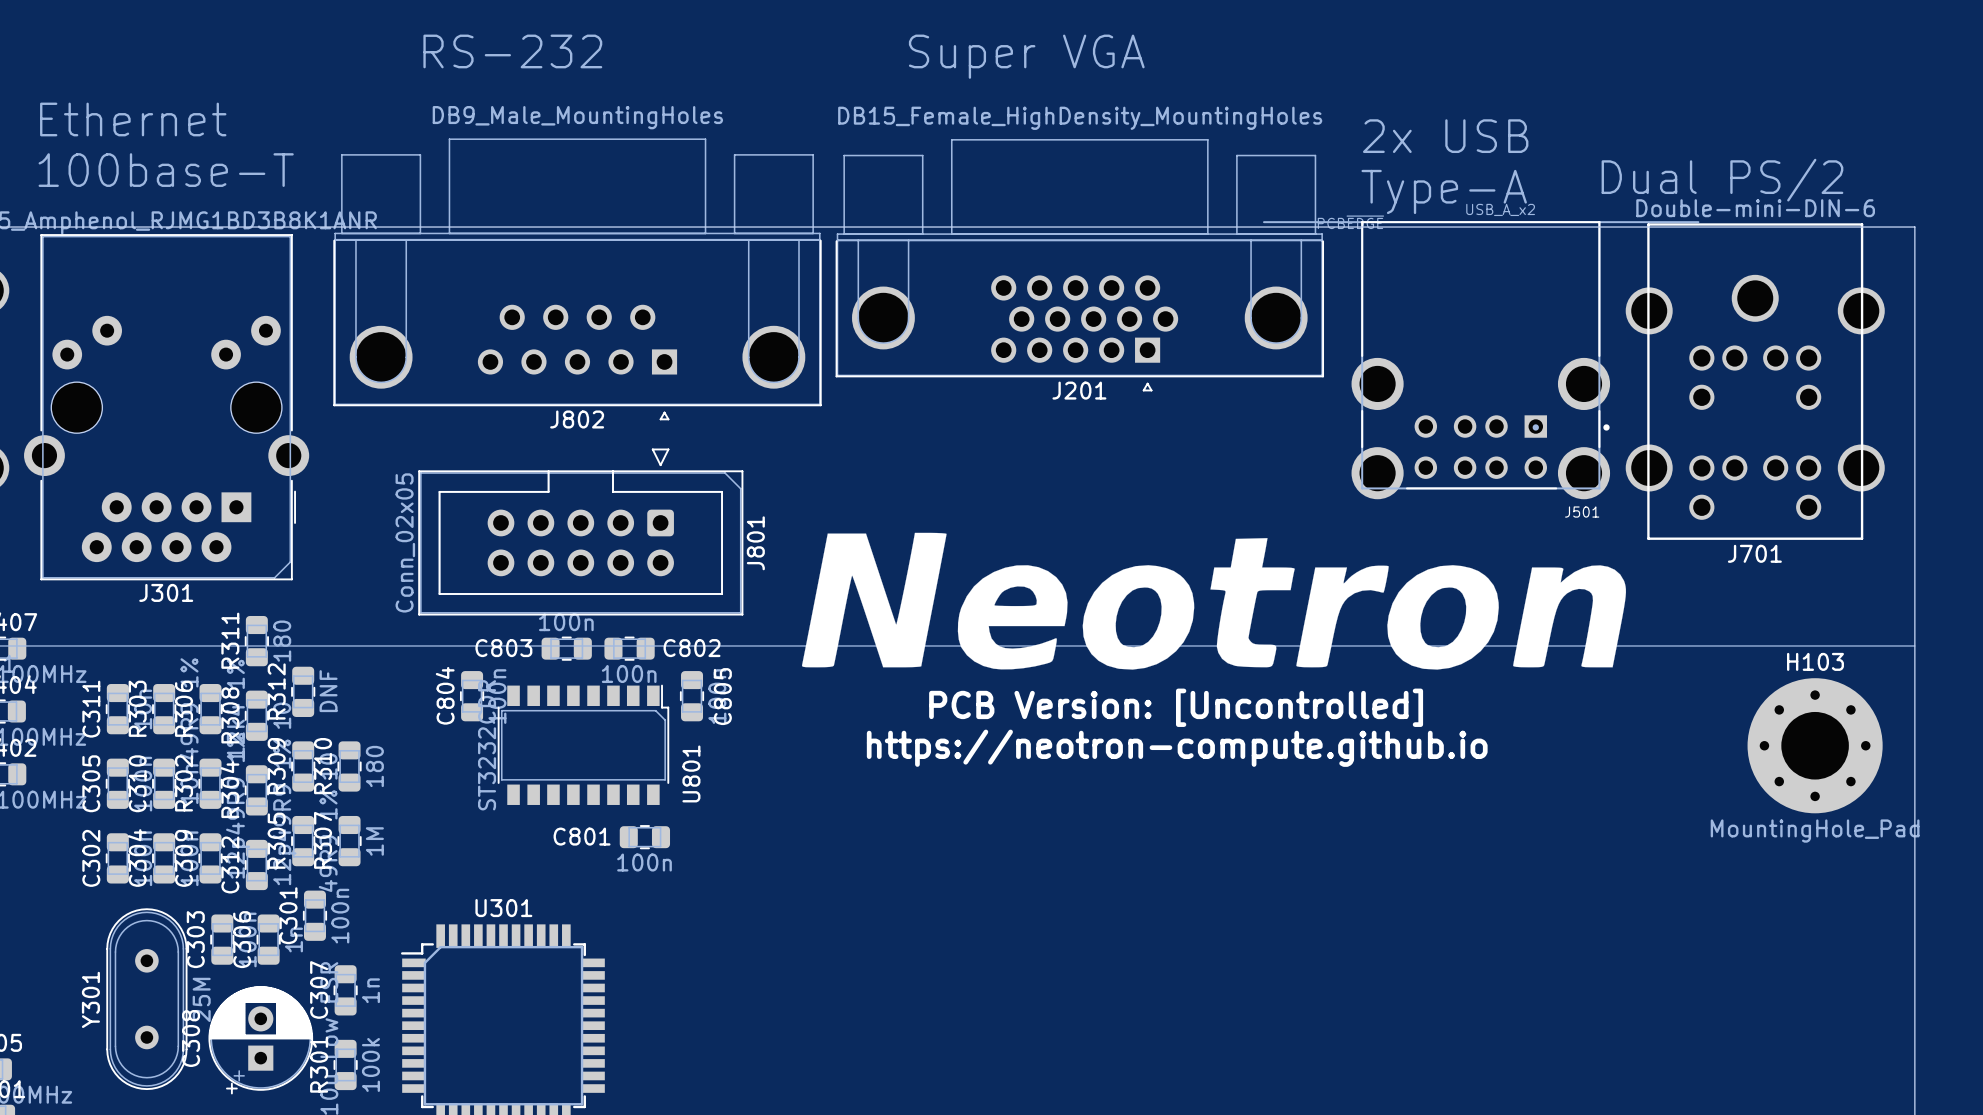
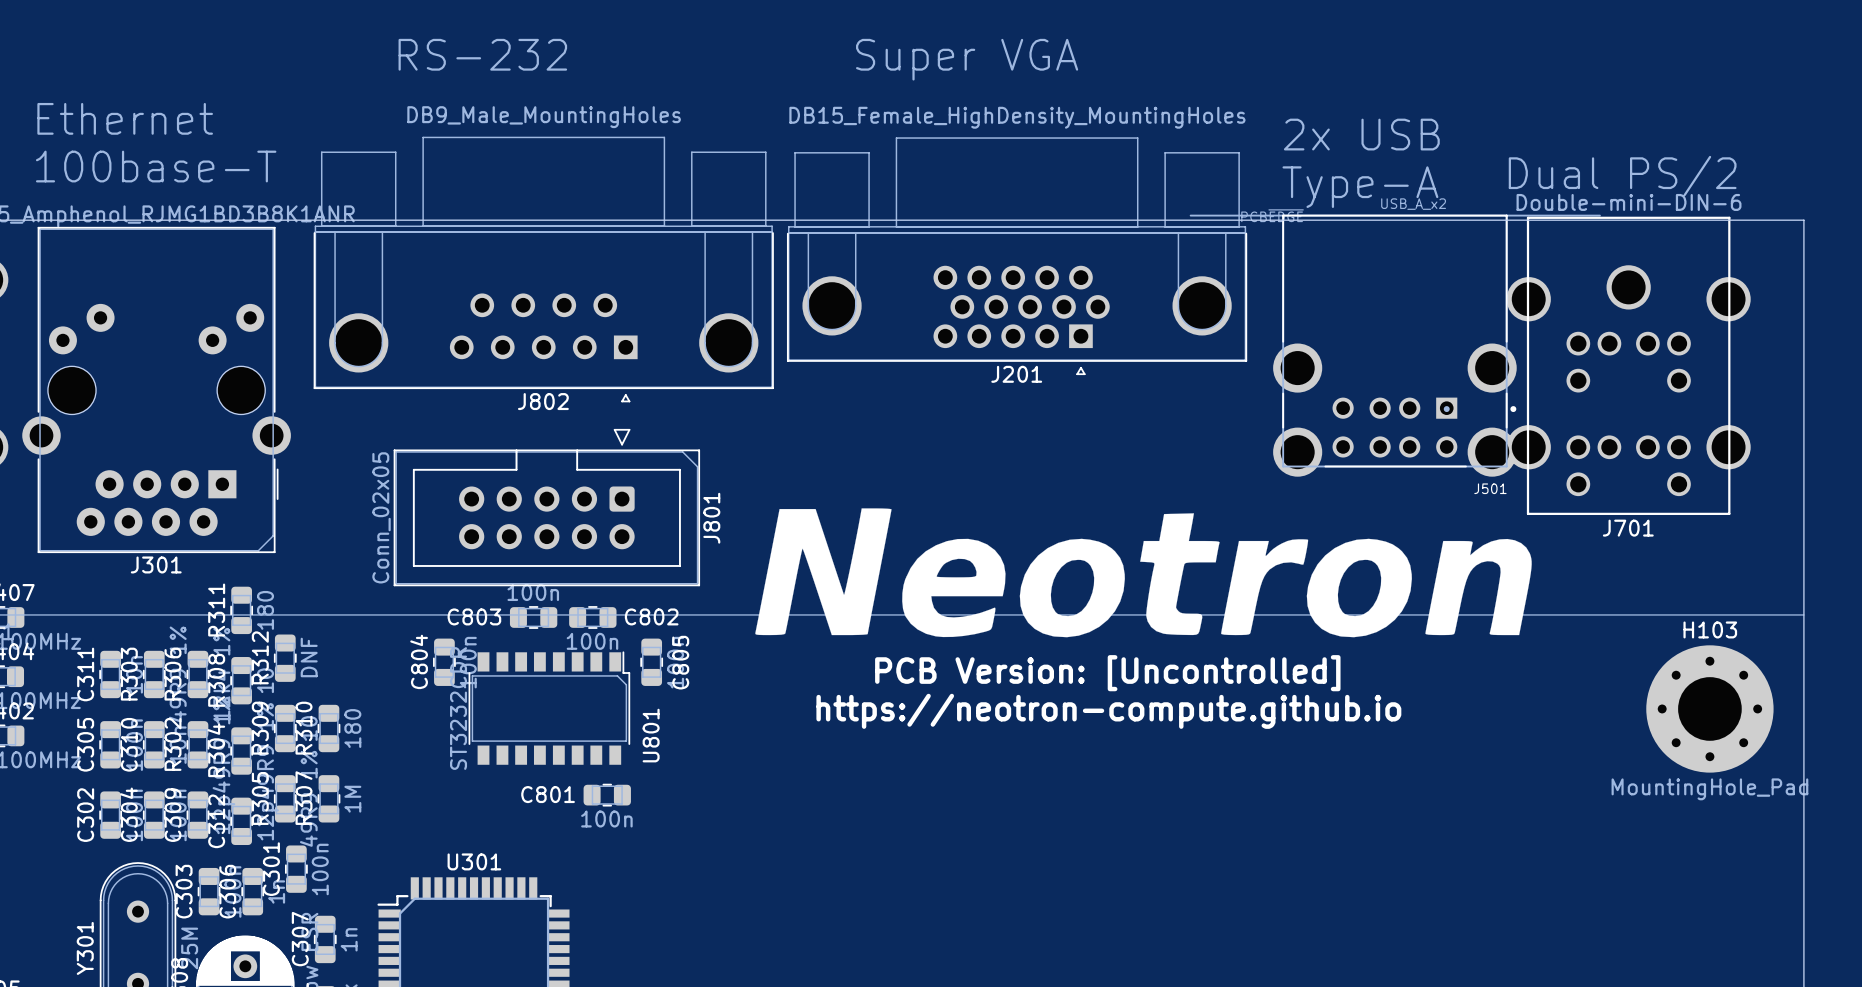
J701 position: (1755, 381) -> (1628, 365)

